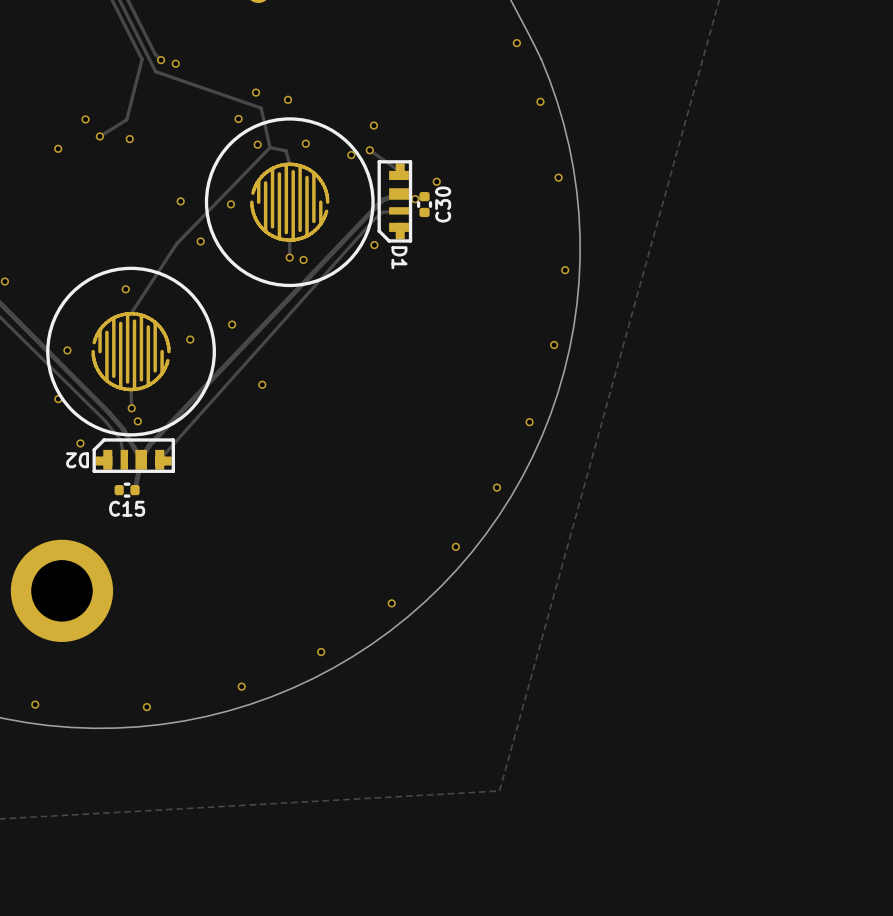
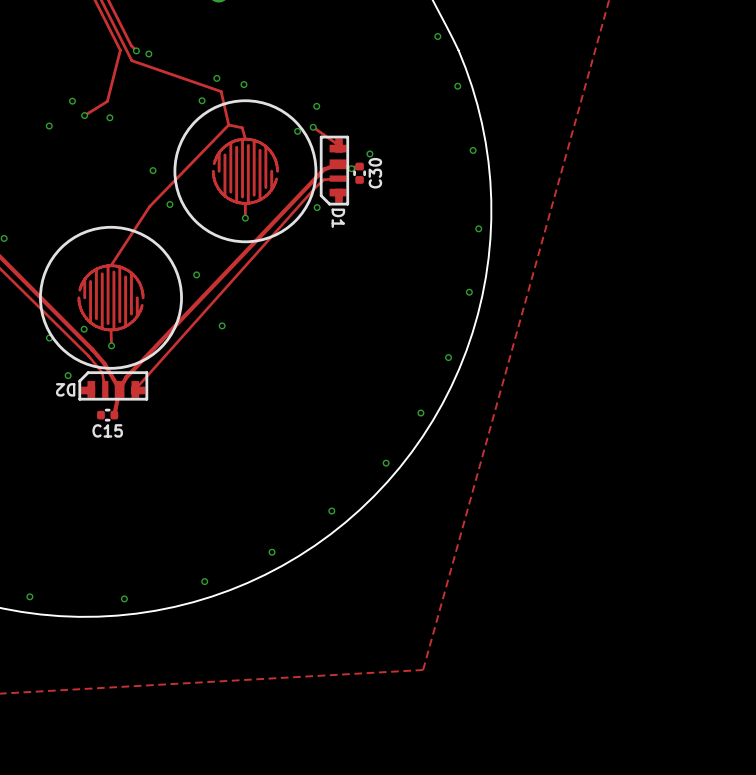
via: (305, 143) -> none
via: (257, 144) -> none
via: (230, 204) -> none
via: (303, 259) -> none
via: (125, 289) -> none
via: (190, 339) -> none
via: (67, 350) -> none
via: none -> (84, 329)
via: (137, 421) -> none
part: (61, 590) -> none

